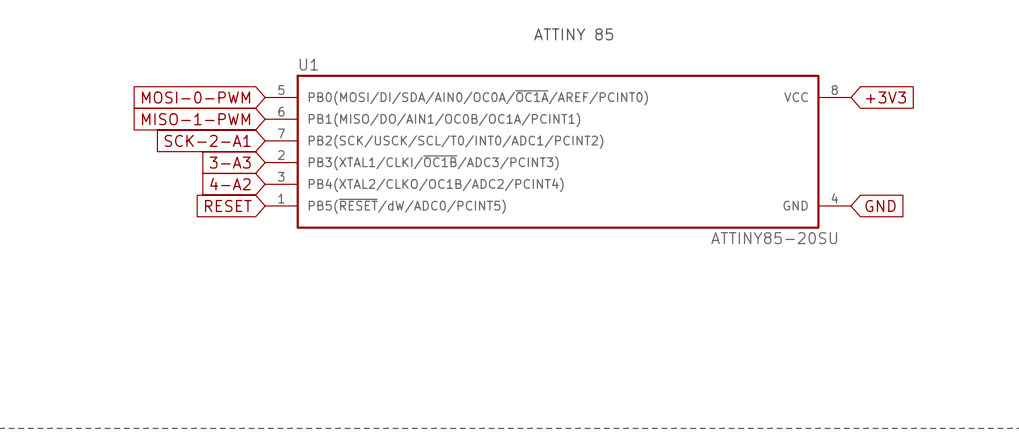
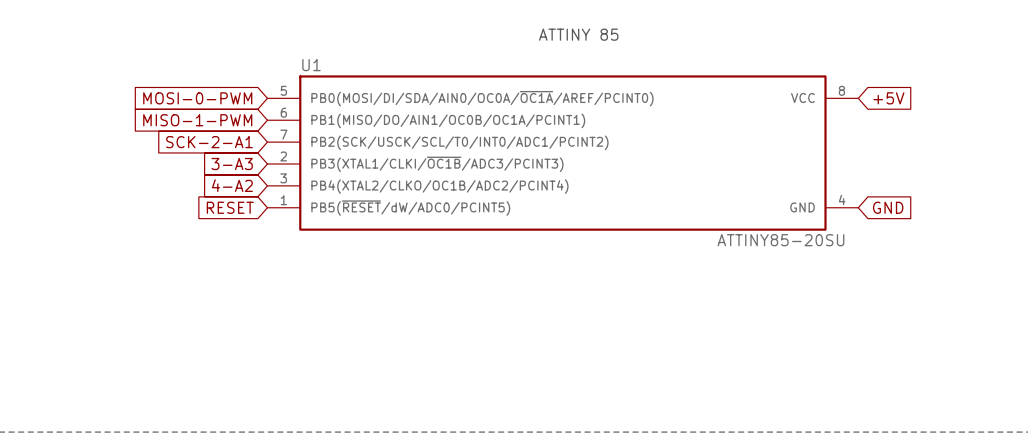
global label: +3V3 (885, 97) -> +5V (888, 98)

